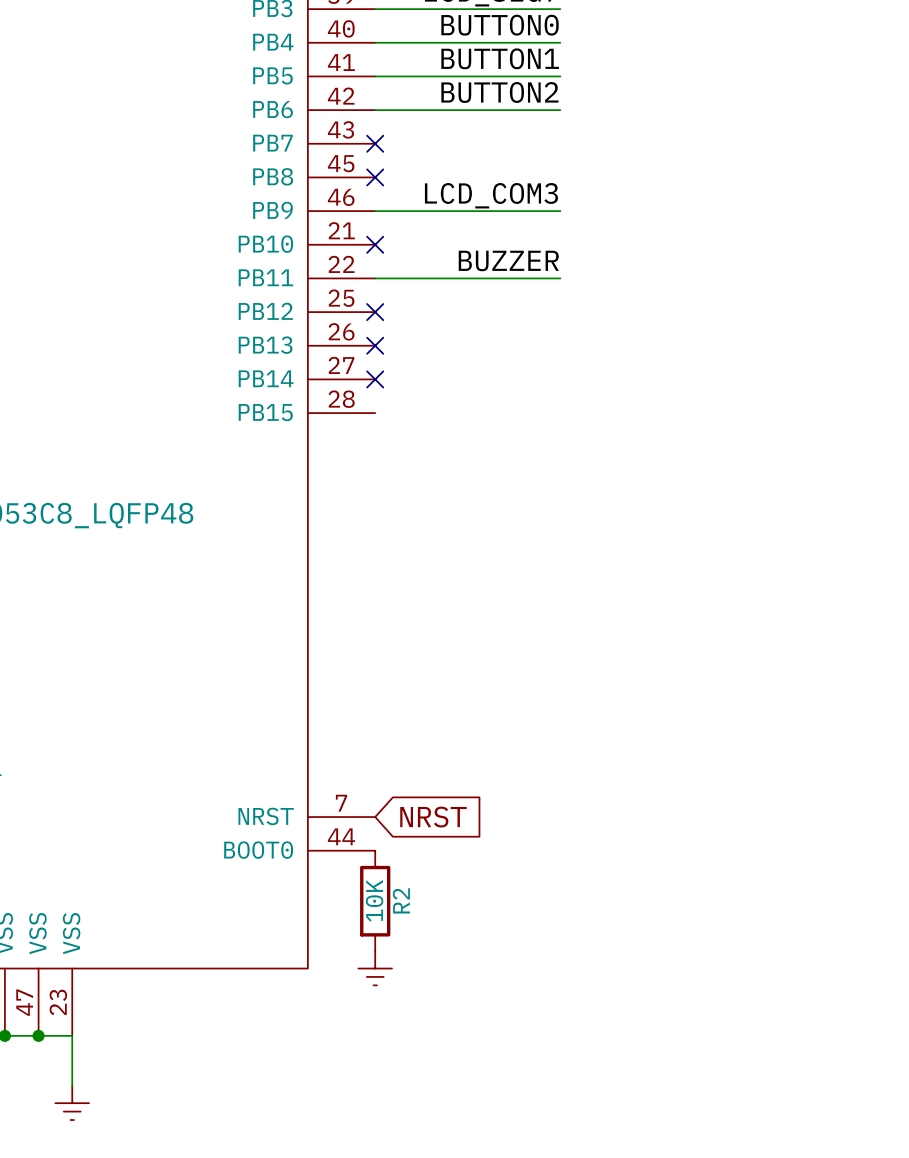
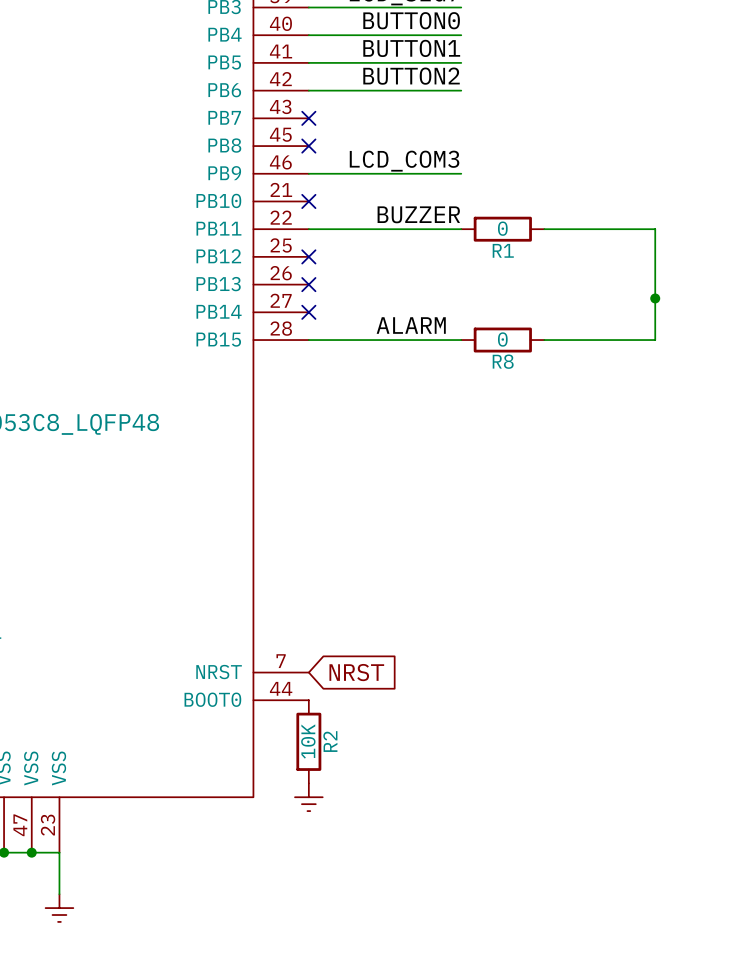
R1: none -> 0 (502, 229)
wire: none -> (544, 229) (655, 229) (655, 340) (544, 340)
junction: none -> (655, 298)
label: none -> ALARM (411, 325)
wire: none -> (308, 340) (461, 340)
R8: none -> 0 (502, 340)

